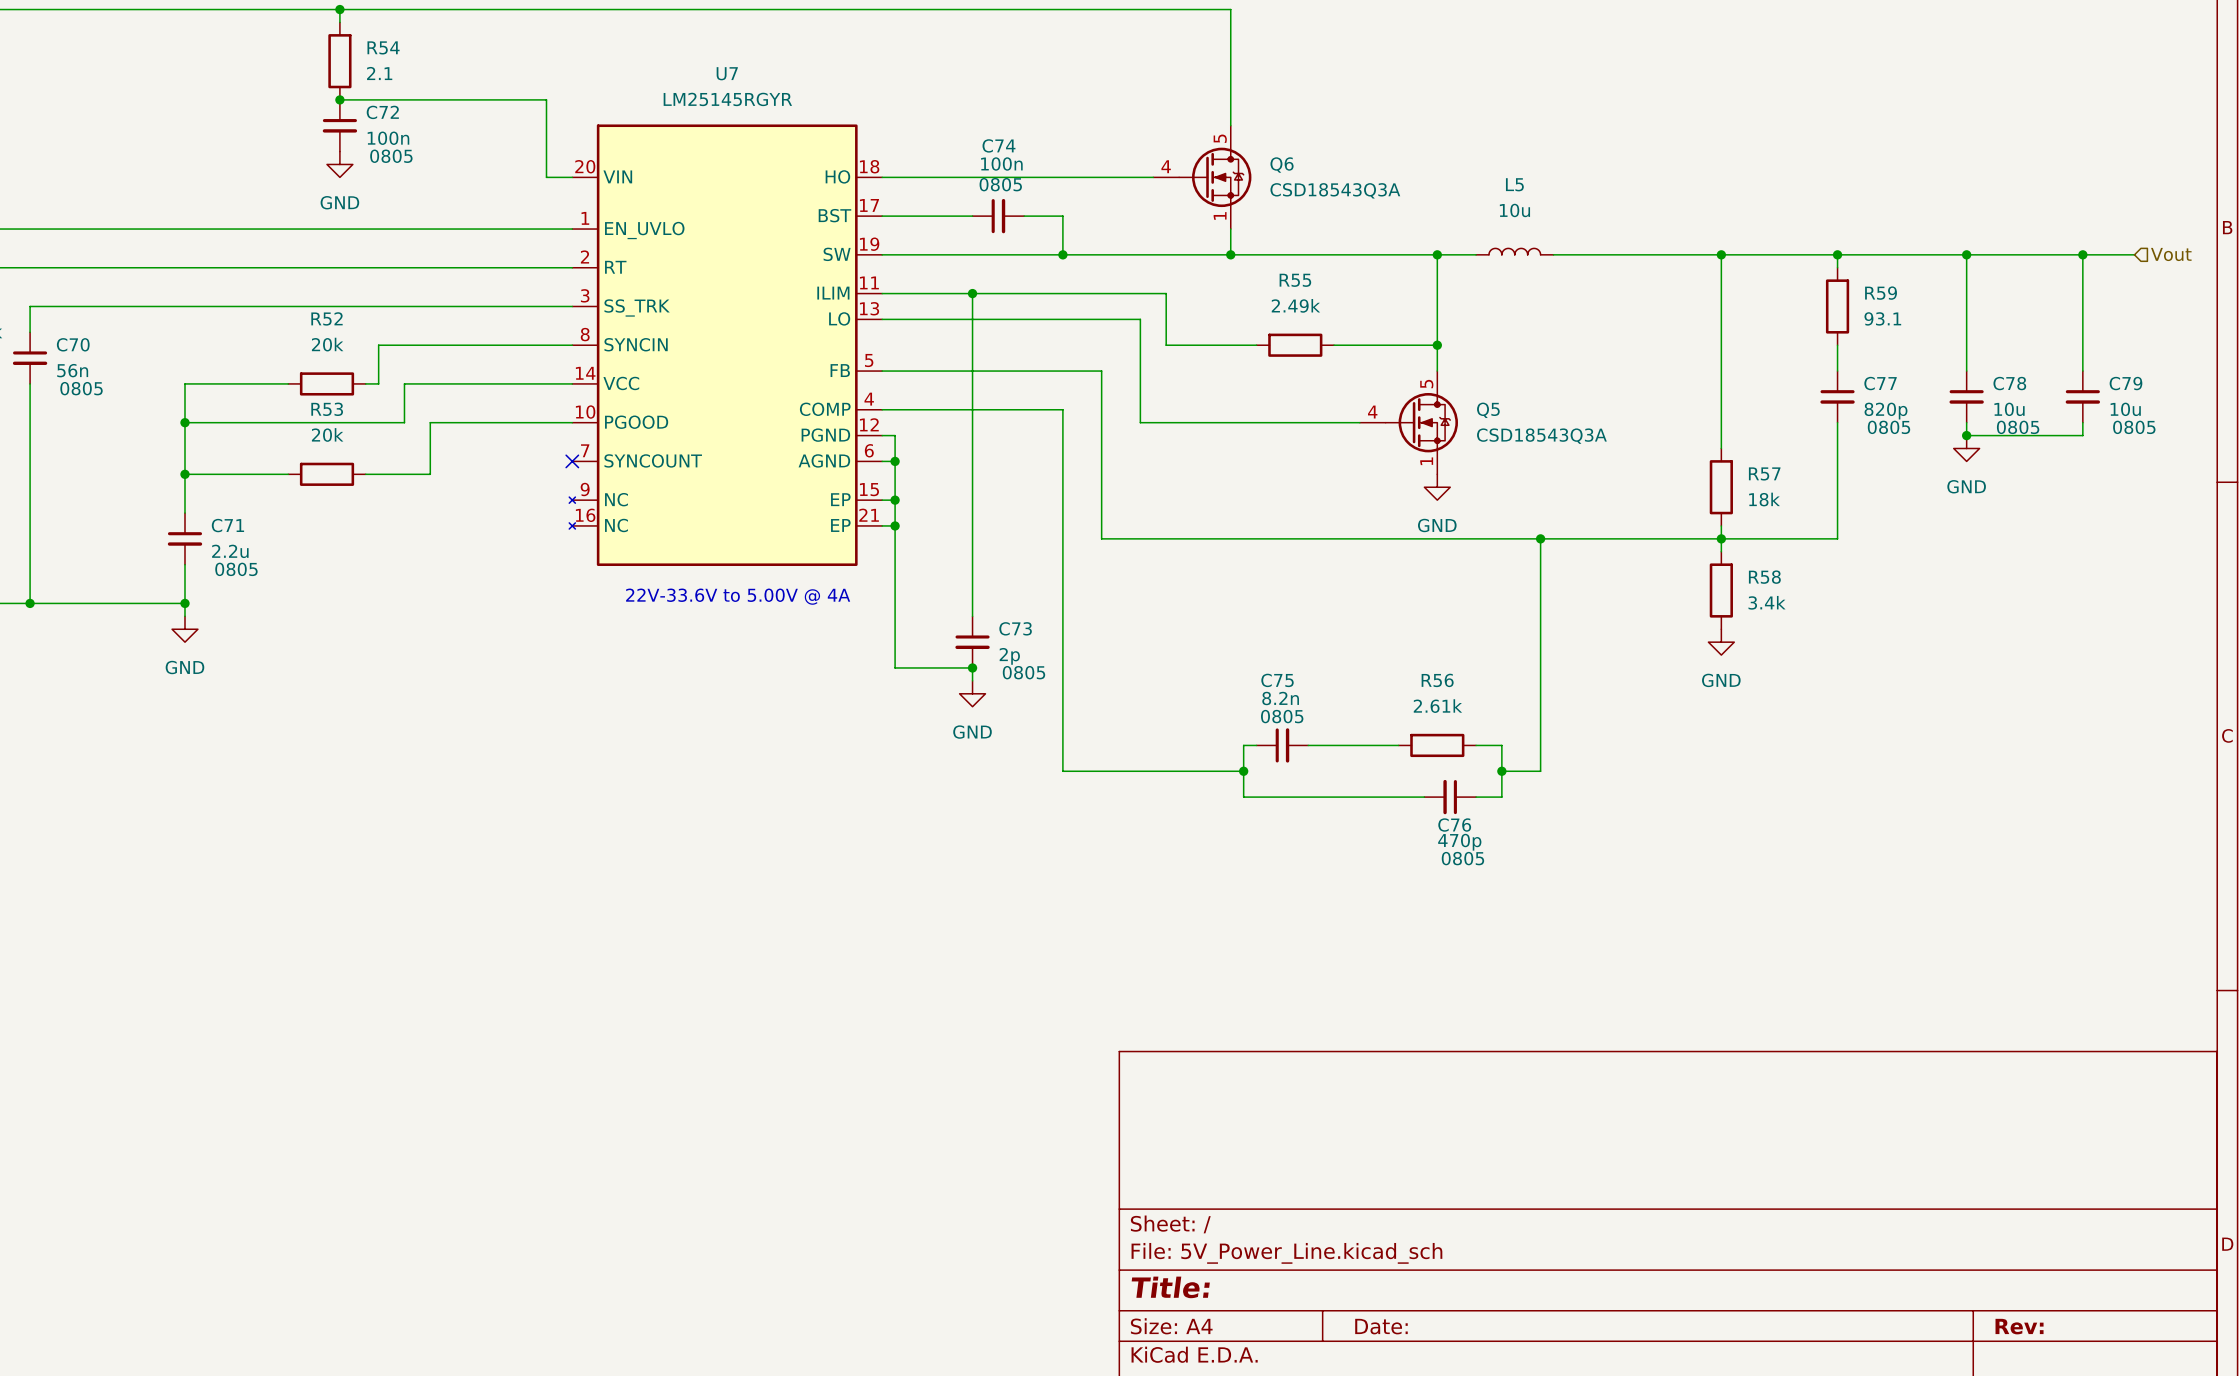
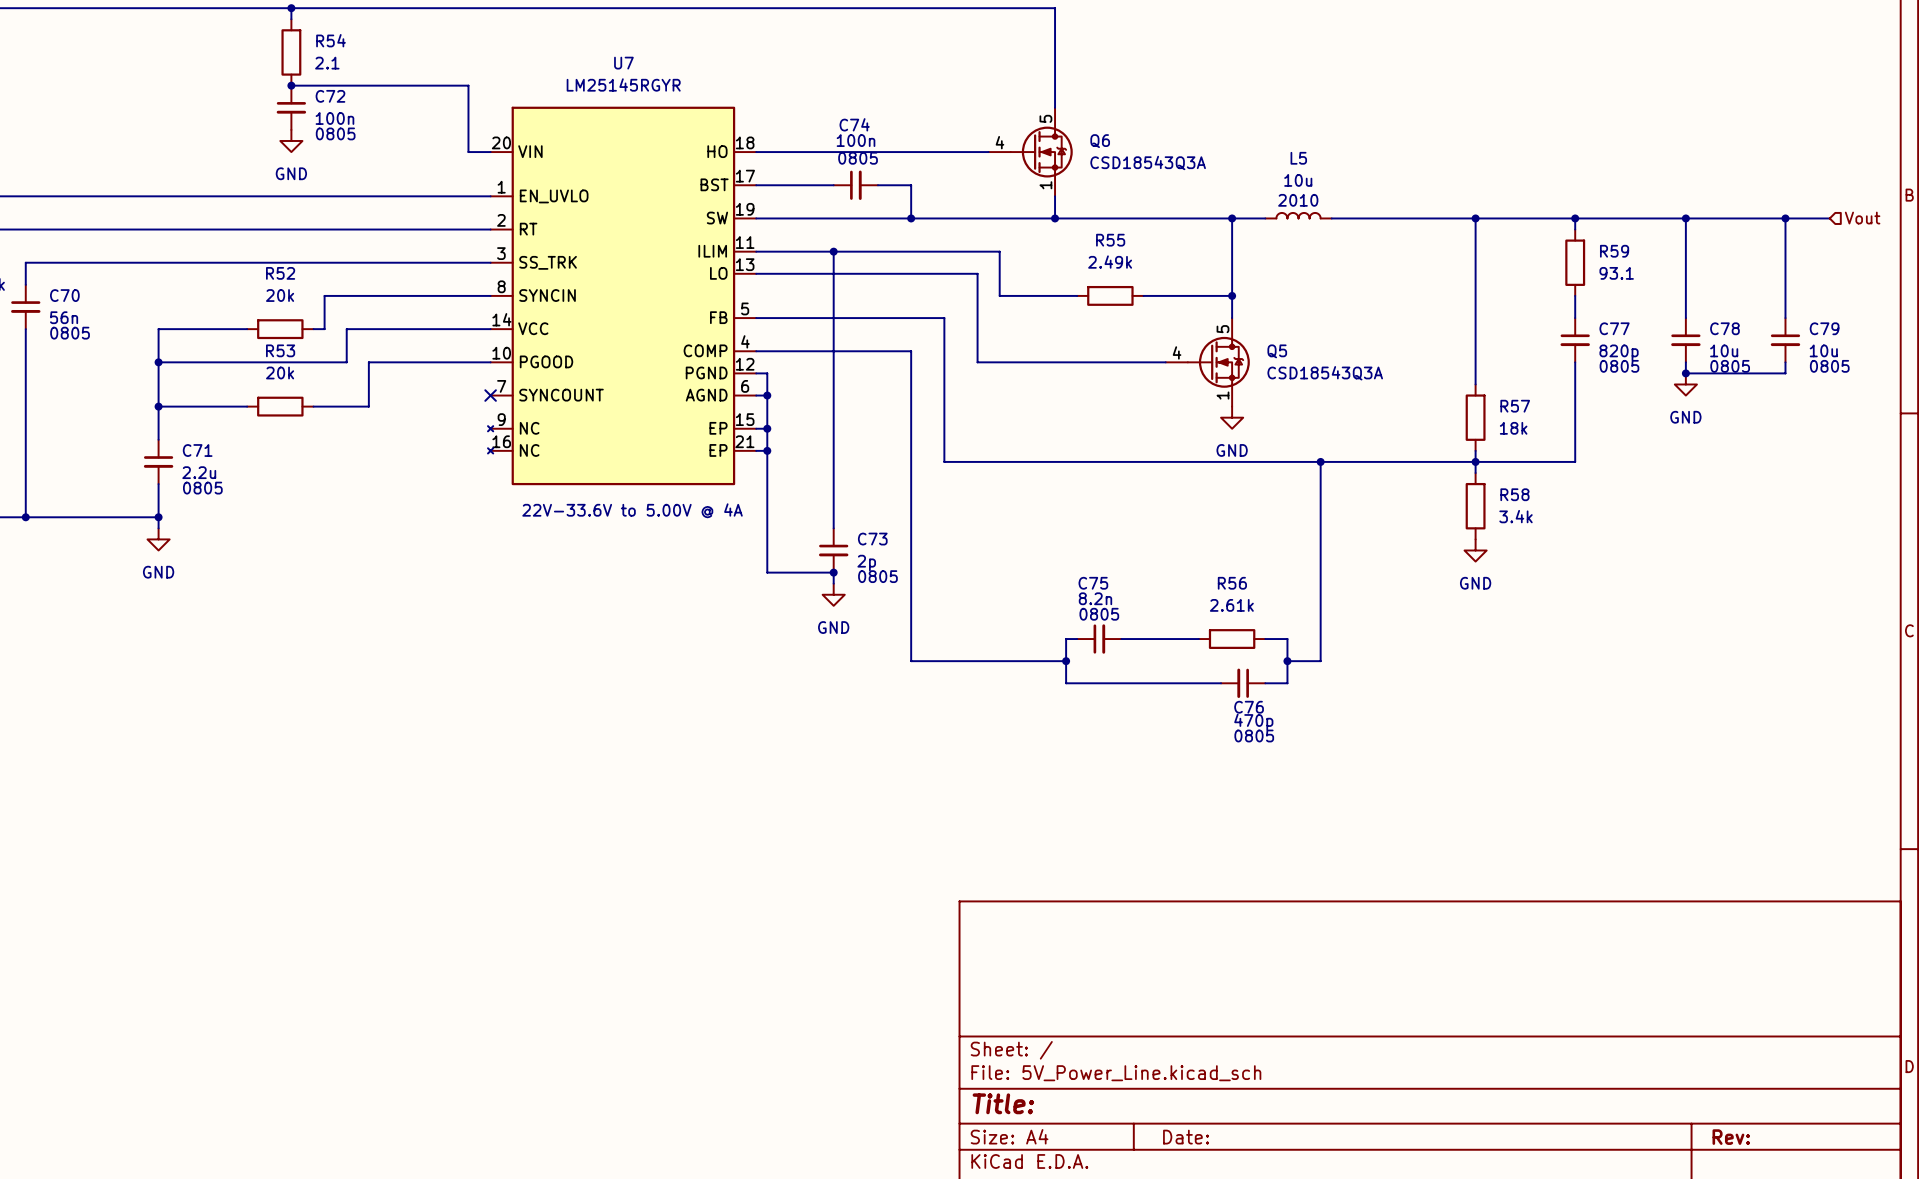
L5 text: none -> 2010 (1298, 200)

